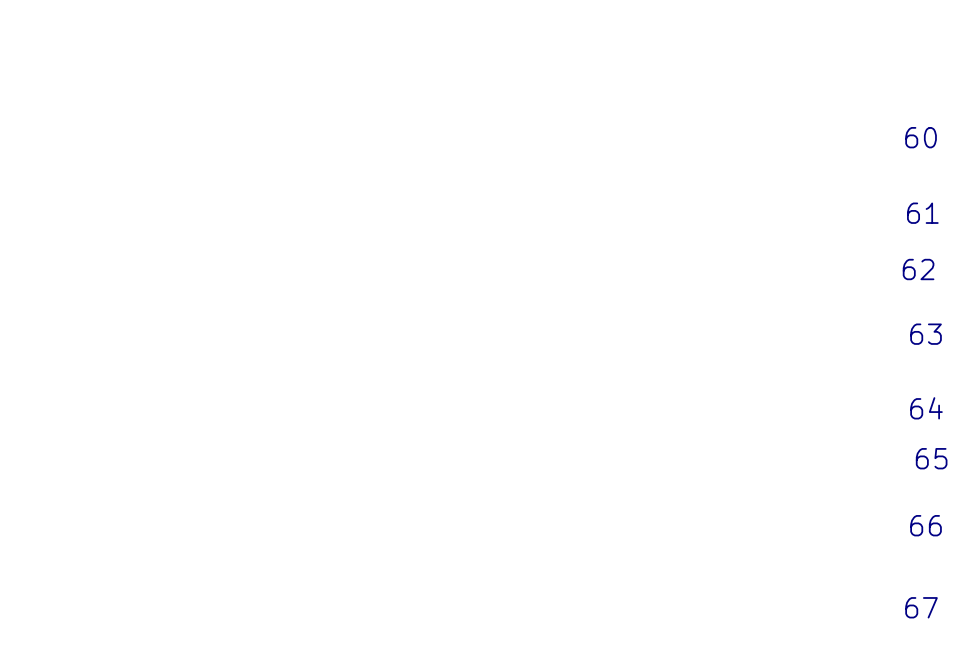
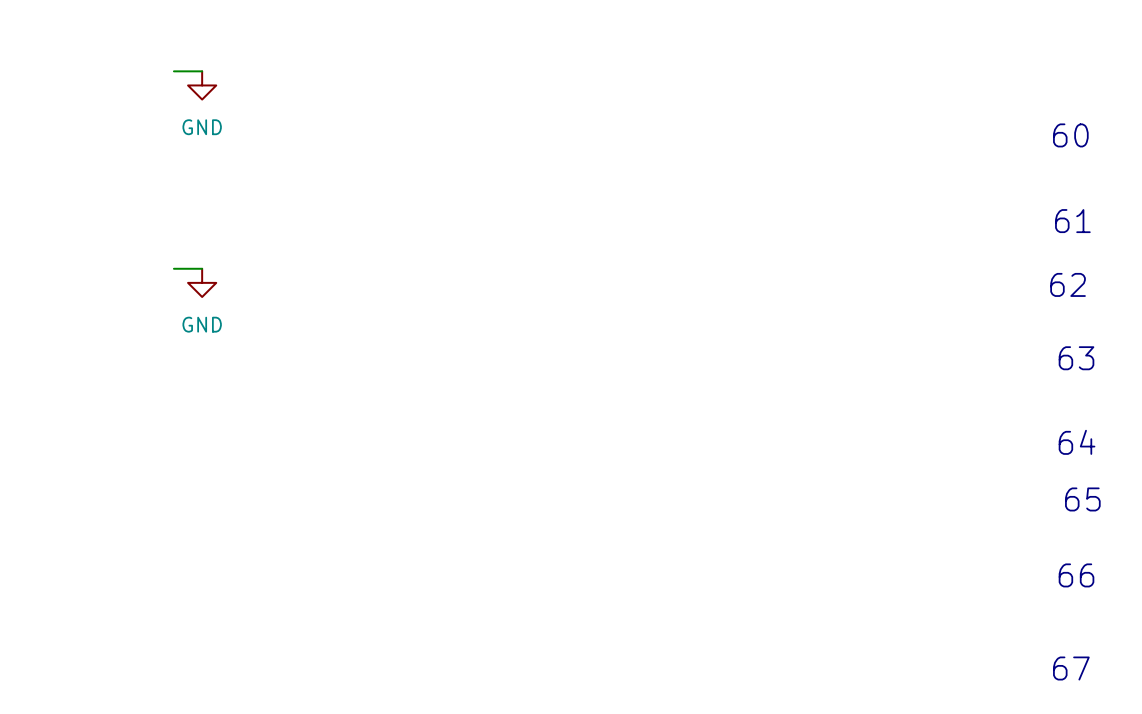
wire: none -> (173, 71) (202, 71)
power symbol: none -> GND (202, 85)
wire: none -> (173, 268) (202, 268)
power symbol: none -> GND (202, 282)

